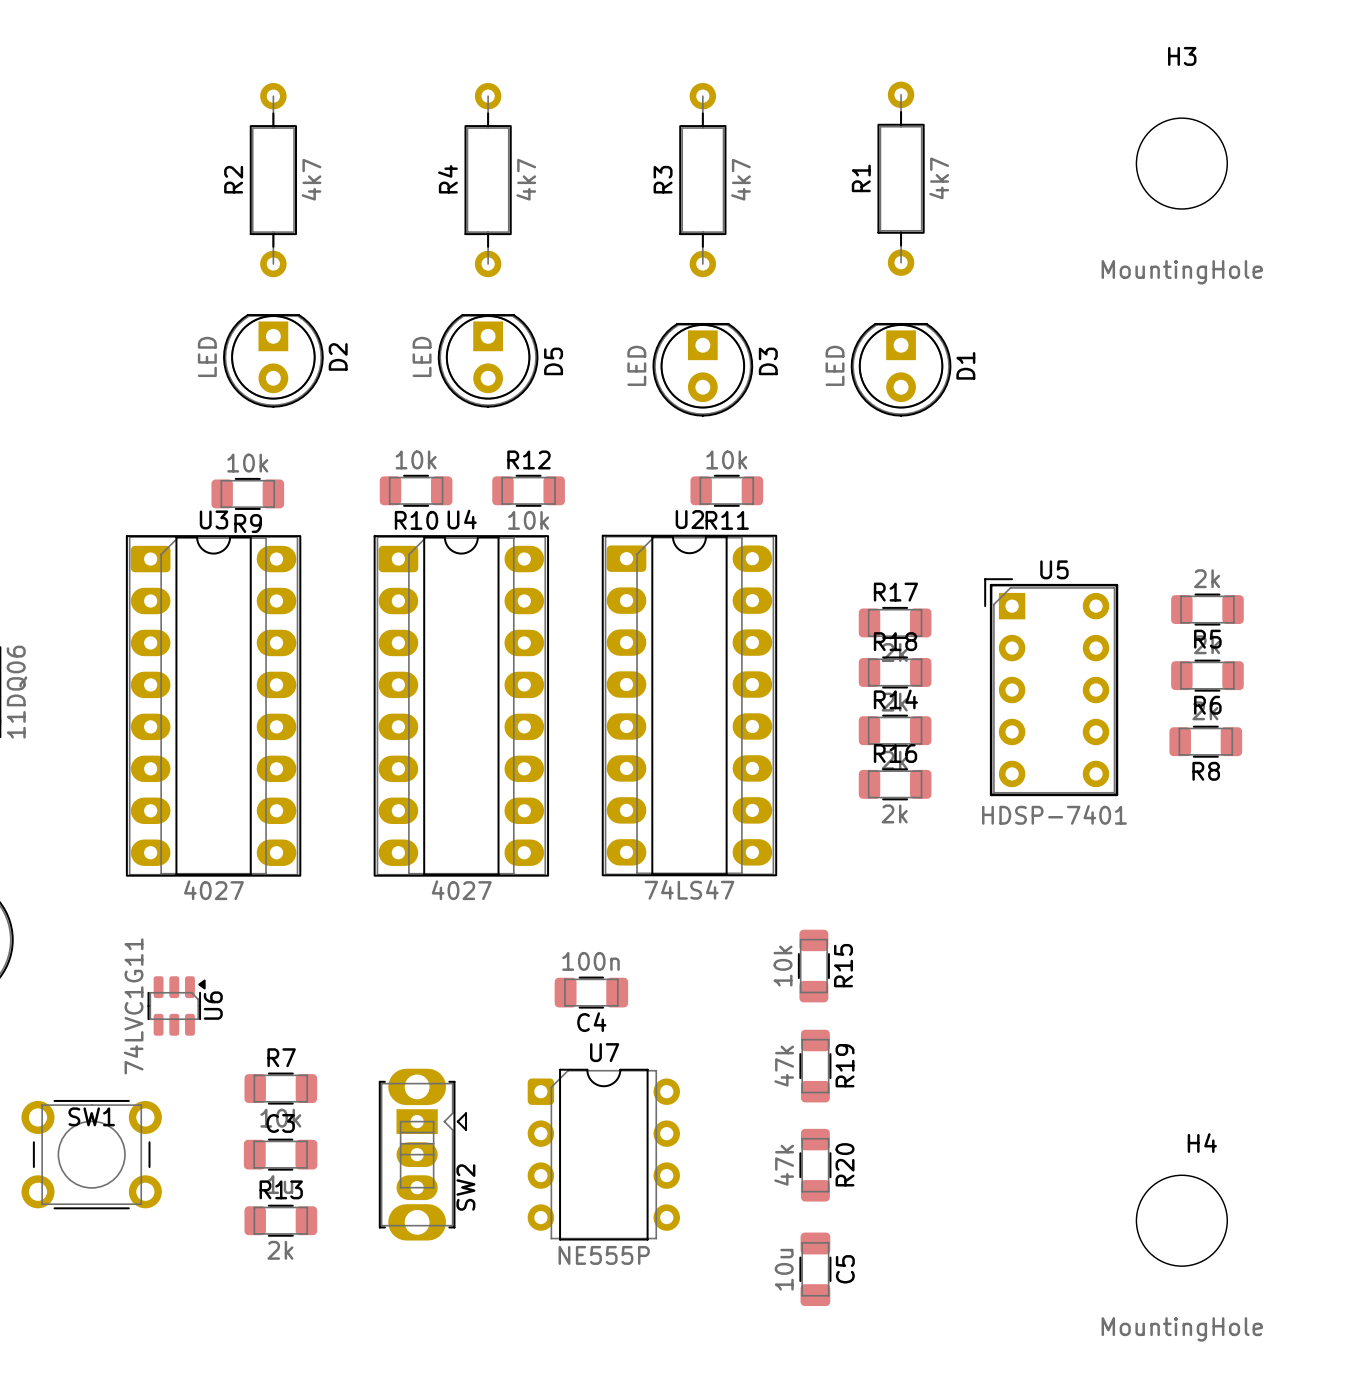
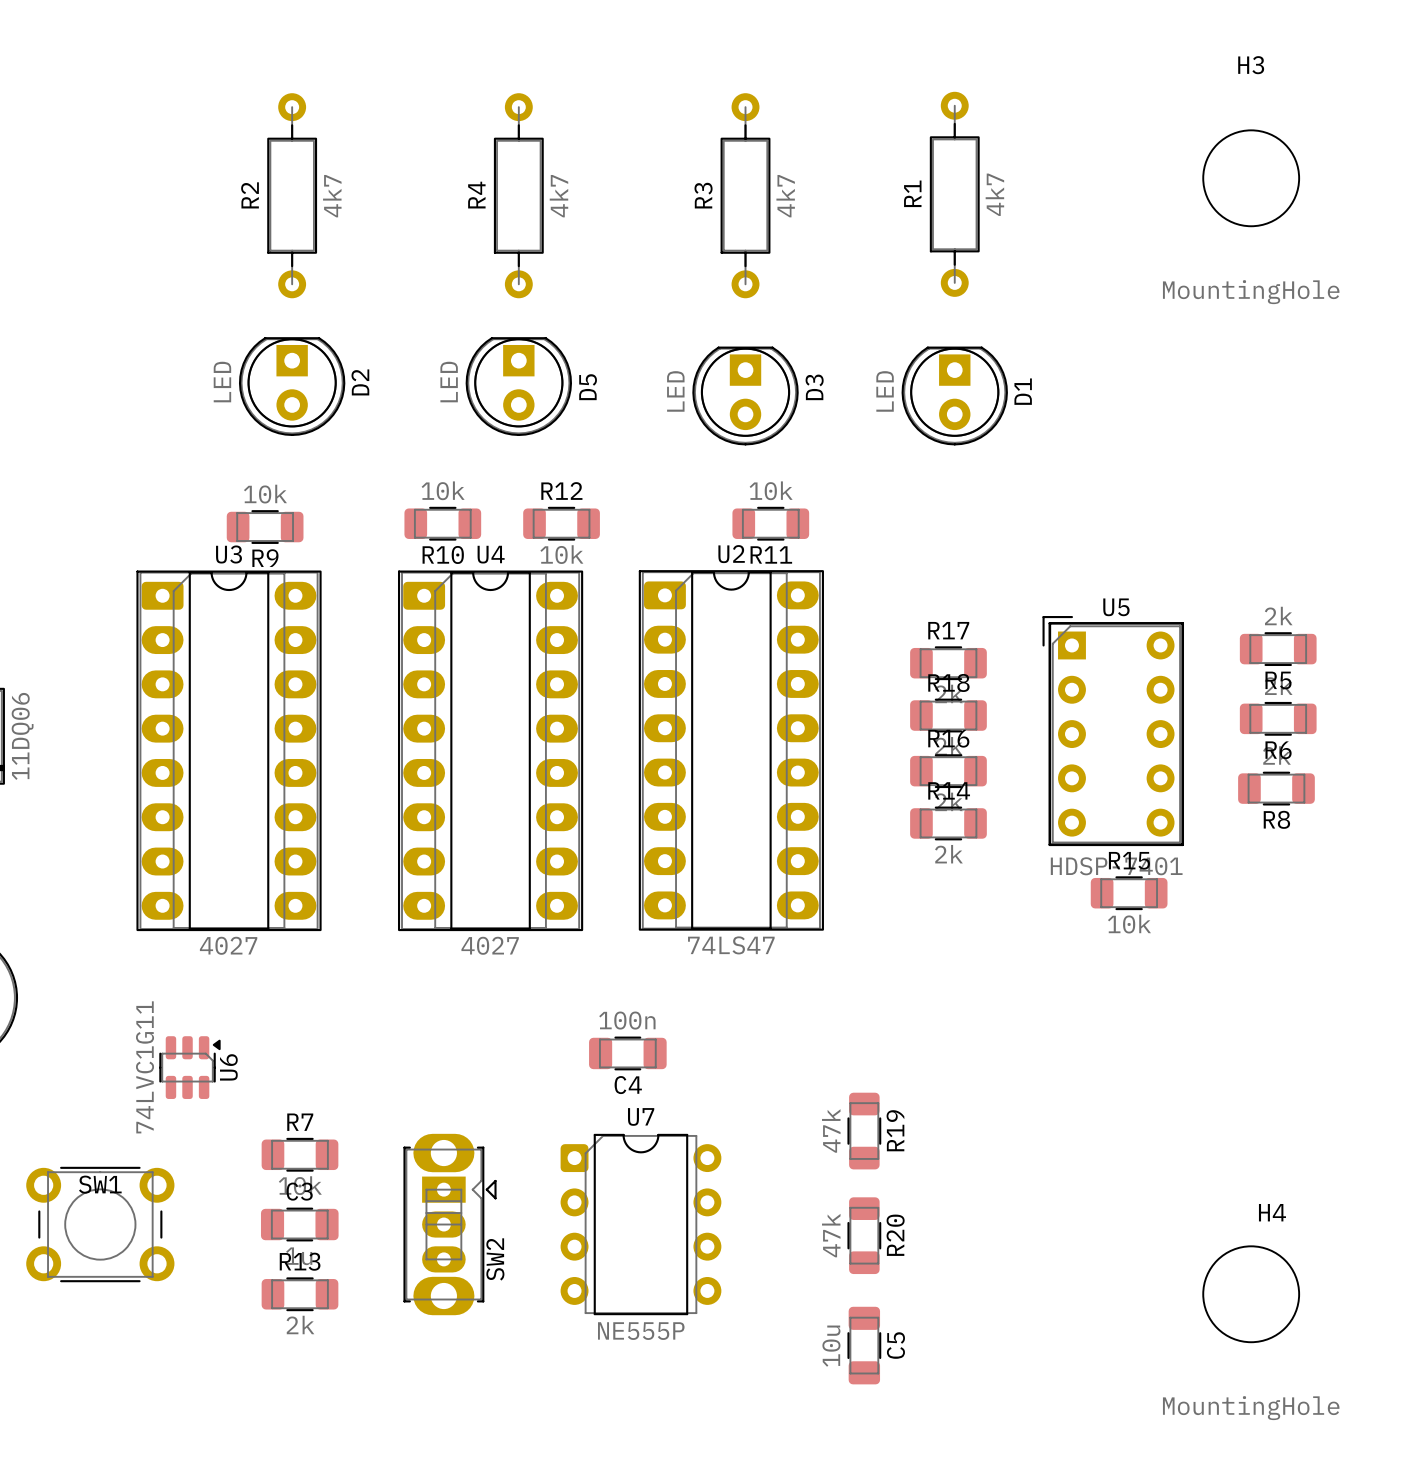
R14 position: (895, 730) -> (948, 823)
R16 position: (895, 784) -> (948, 771)
R15 name position: R15 (843, 965) -> R15 (1129, 860)
R15 value position: 10k (783, 966) -> 10k (1129, 924)
R15 rotation: 0° (813, 966) -> 90° clockwise (1129, 893)
R15 position: (813, 966) -> (1129, 893)

